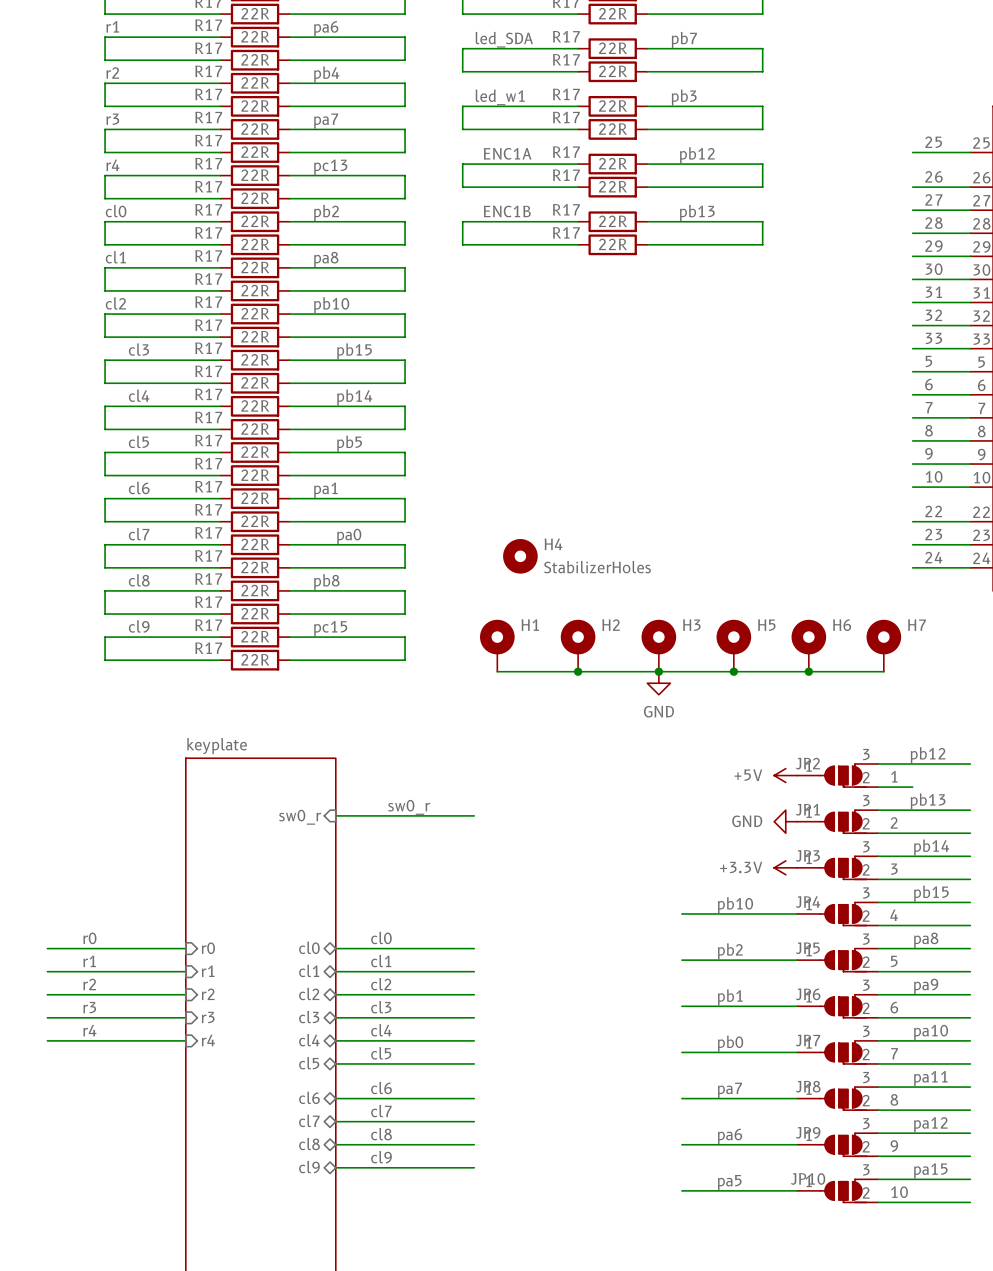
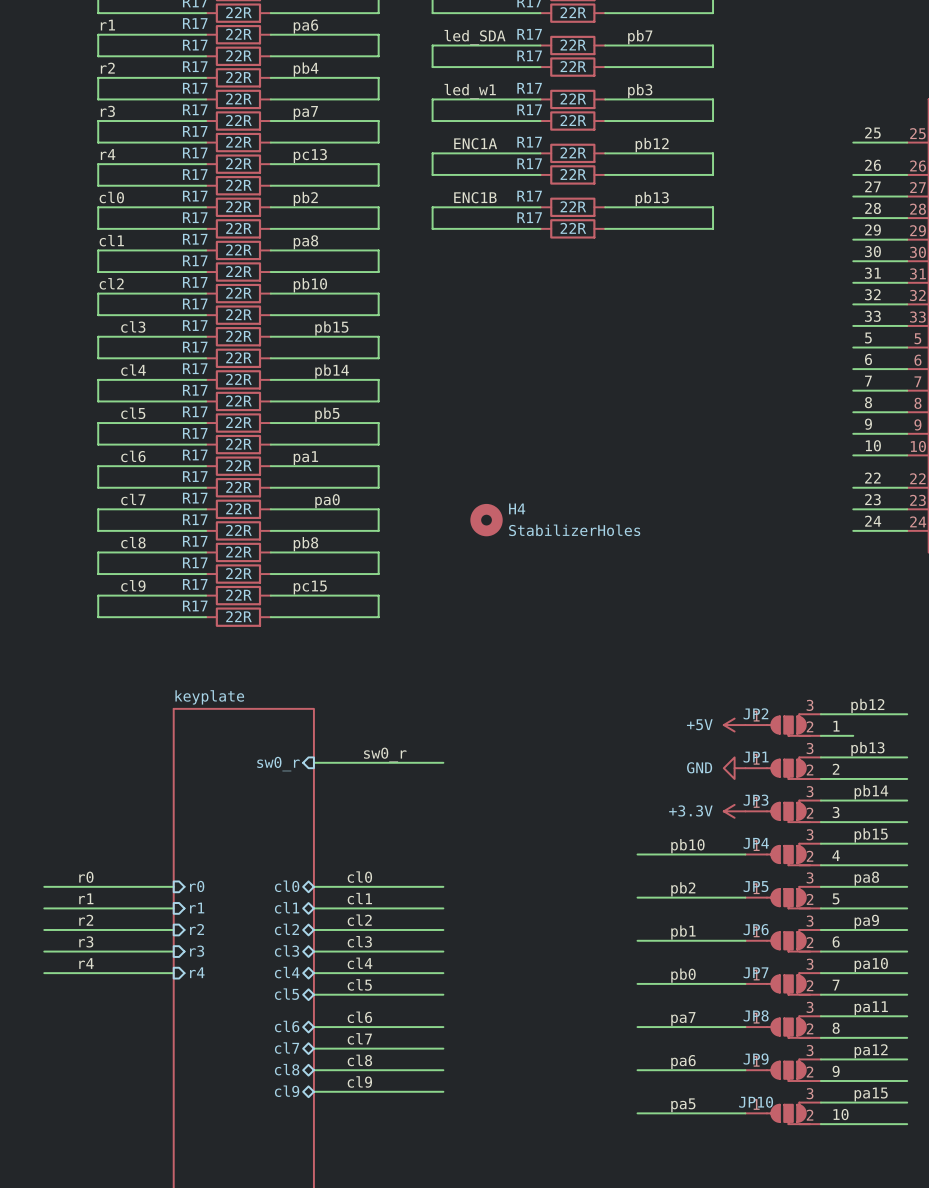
H1: (497, 645) -> none
H2: (578, 645) -> none
H3: (658, 645) -> none
H5: (733, 645) -> none
H6: (808, 645) -> none
H7: (883, 645) -> none
wire: (497, 671) (883, 671) -> none
junction: (578, 671) -> none
junction: (658, 671) -> none
junction: (733, 671) -> none
junction: (808, 671) -> none
power symbol: GND (658, 683) -> none

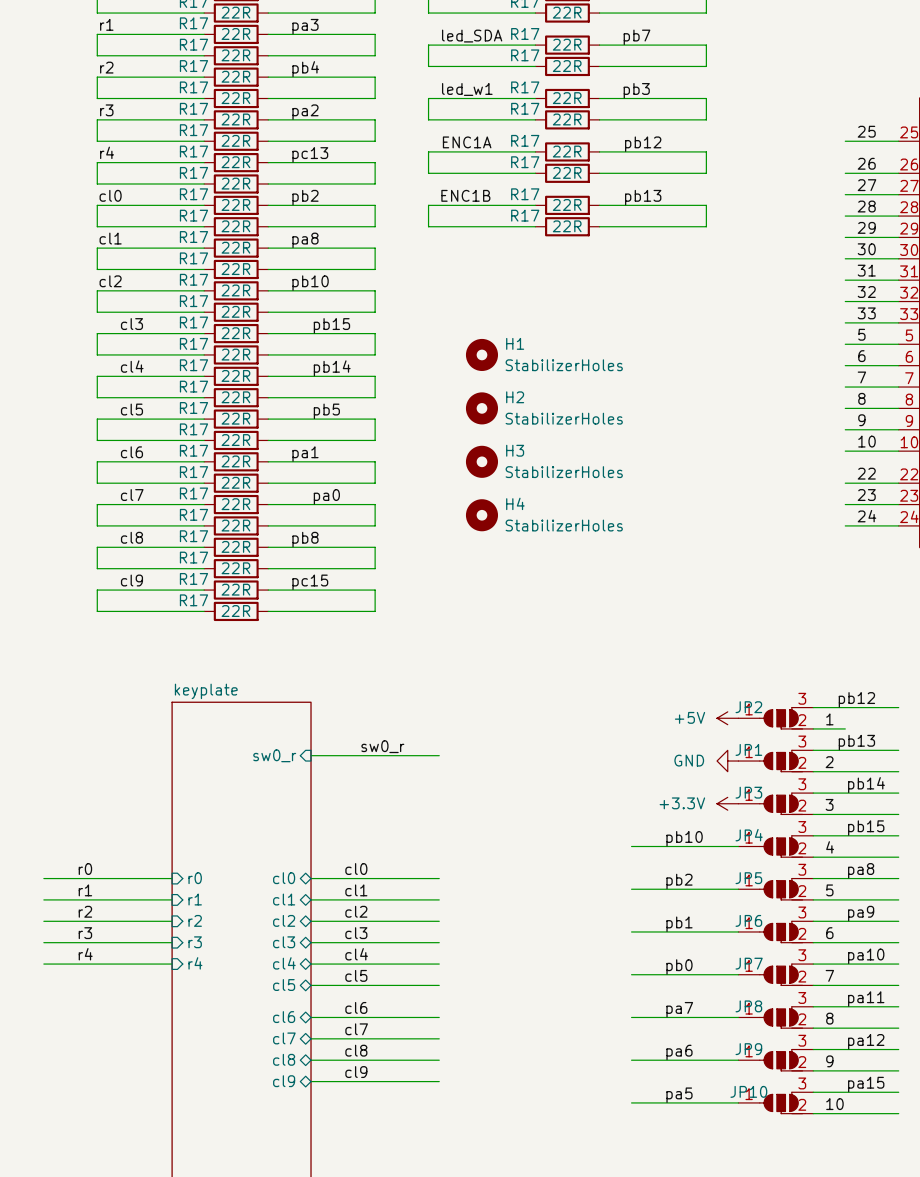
label: pa6 (305, 26) -> pa3 (305, 26)
label: pa7 (305, 112) -> pa2 (305, 112)
H1: none -> StabilizerHoles (481, 354)
H2: none -> StabilizerHoles (481, 408)
H3: none -> StabilizerHoles (481, 461)

